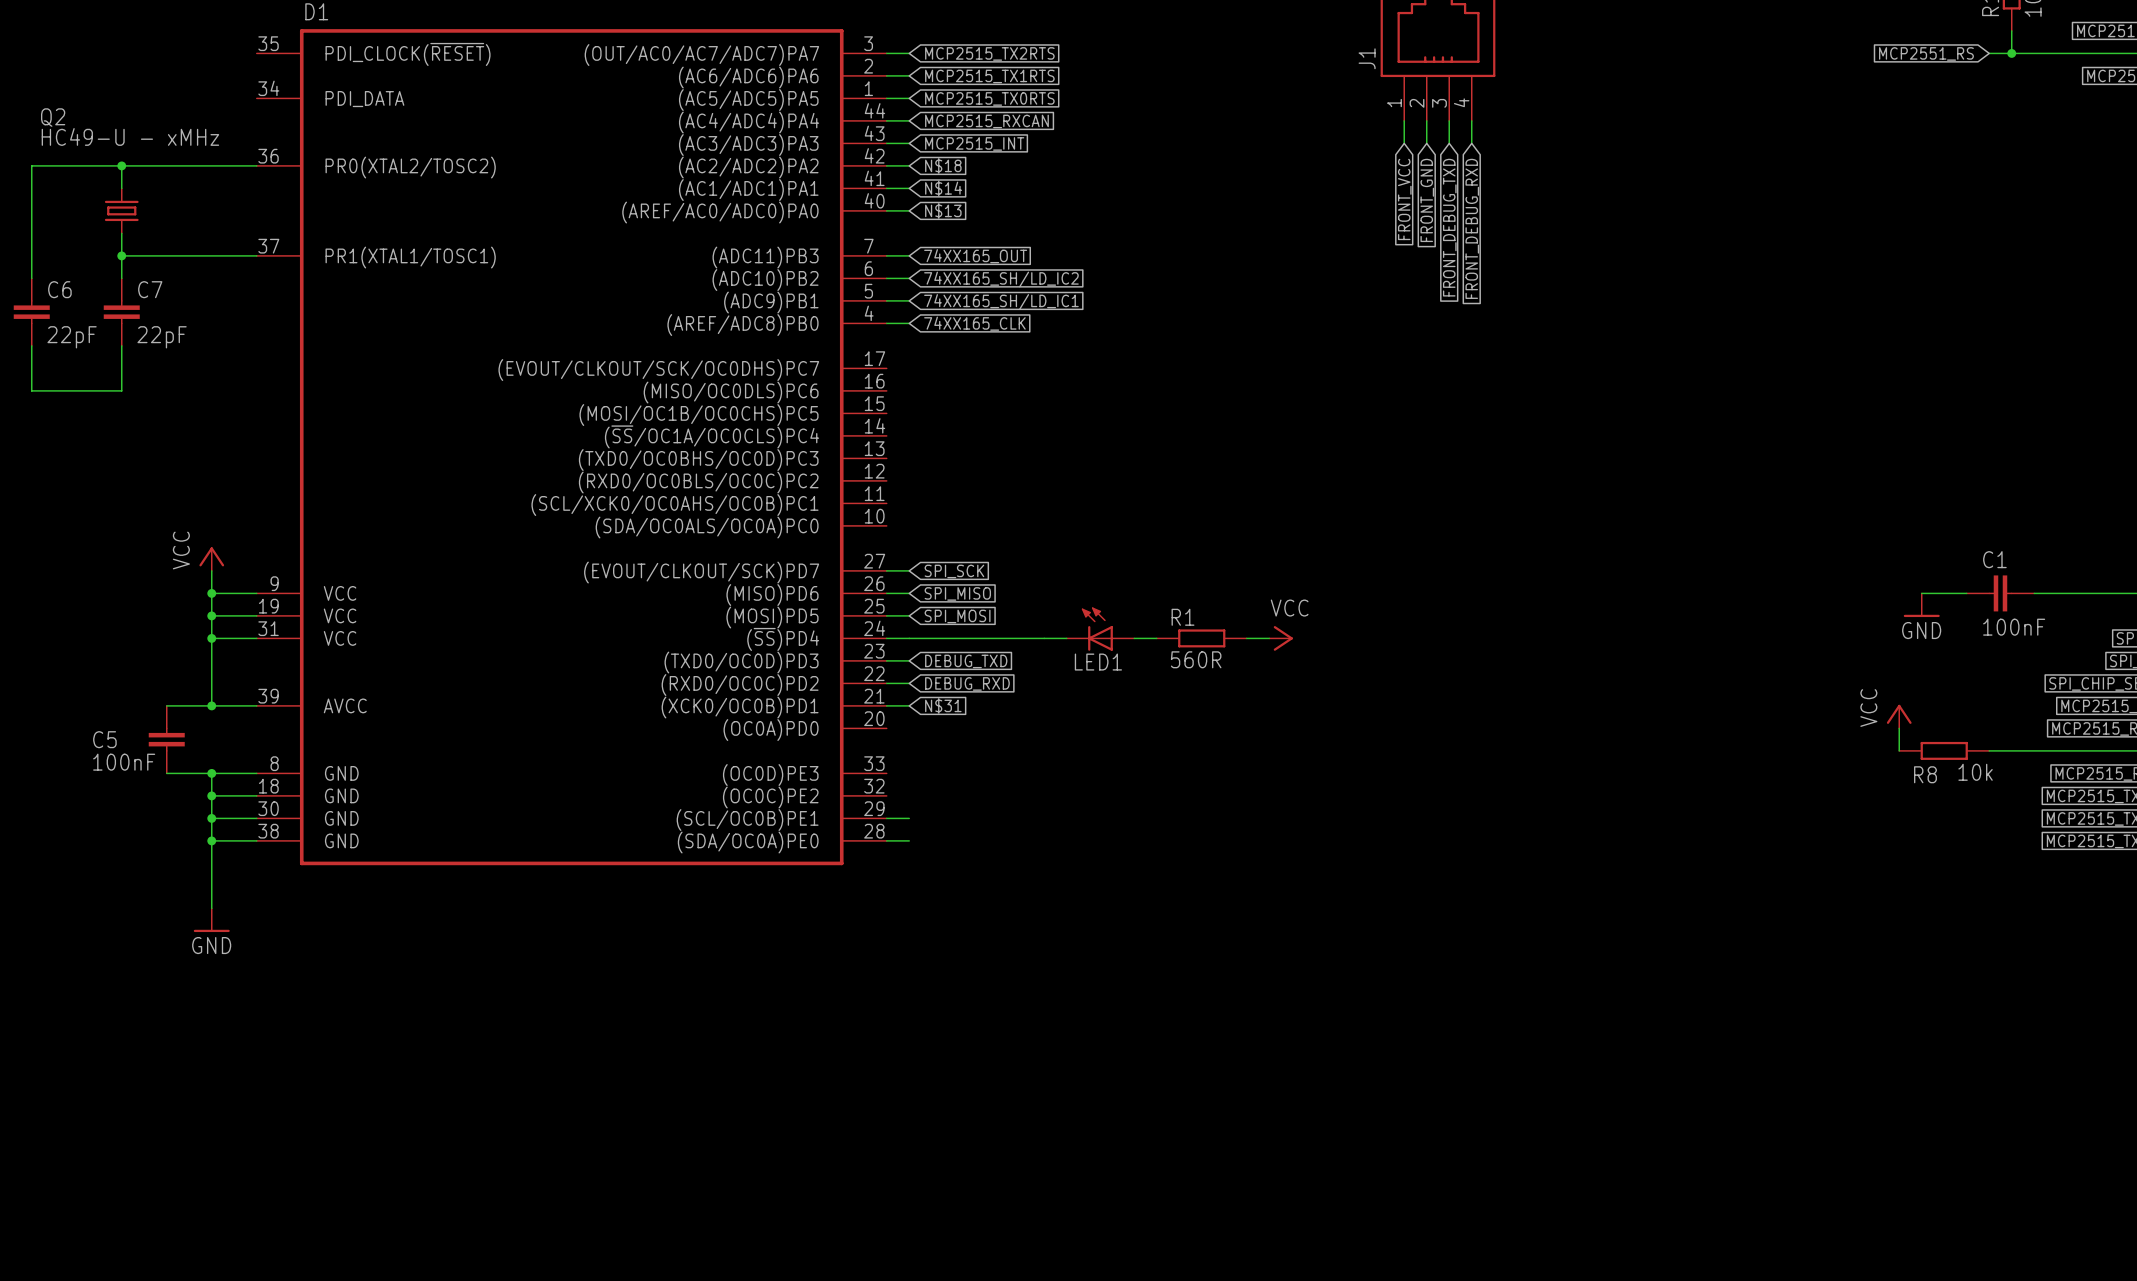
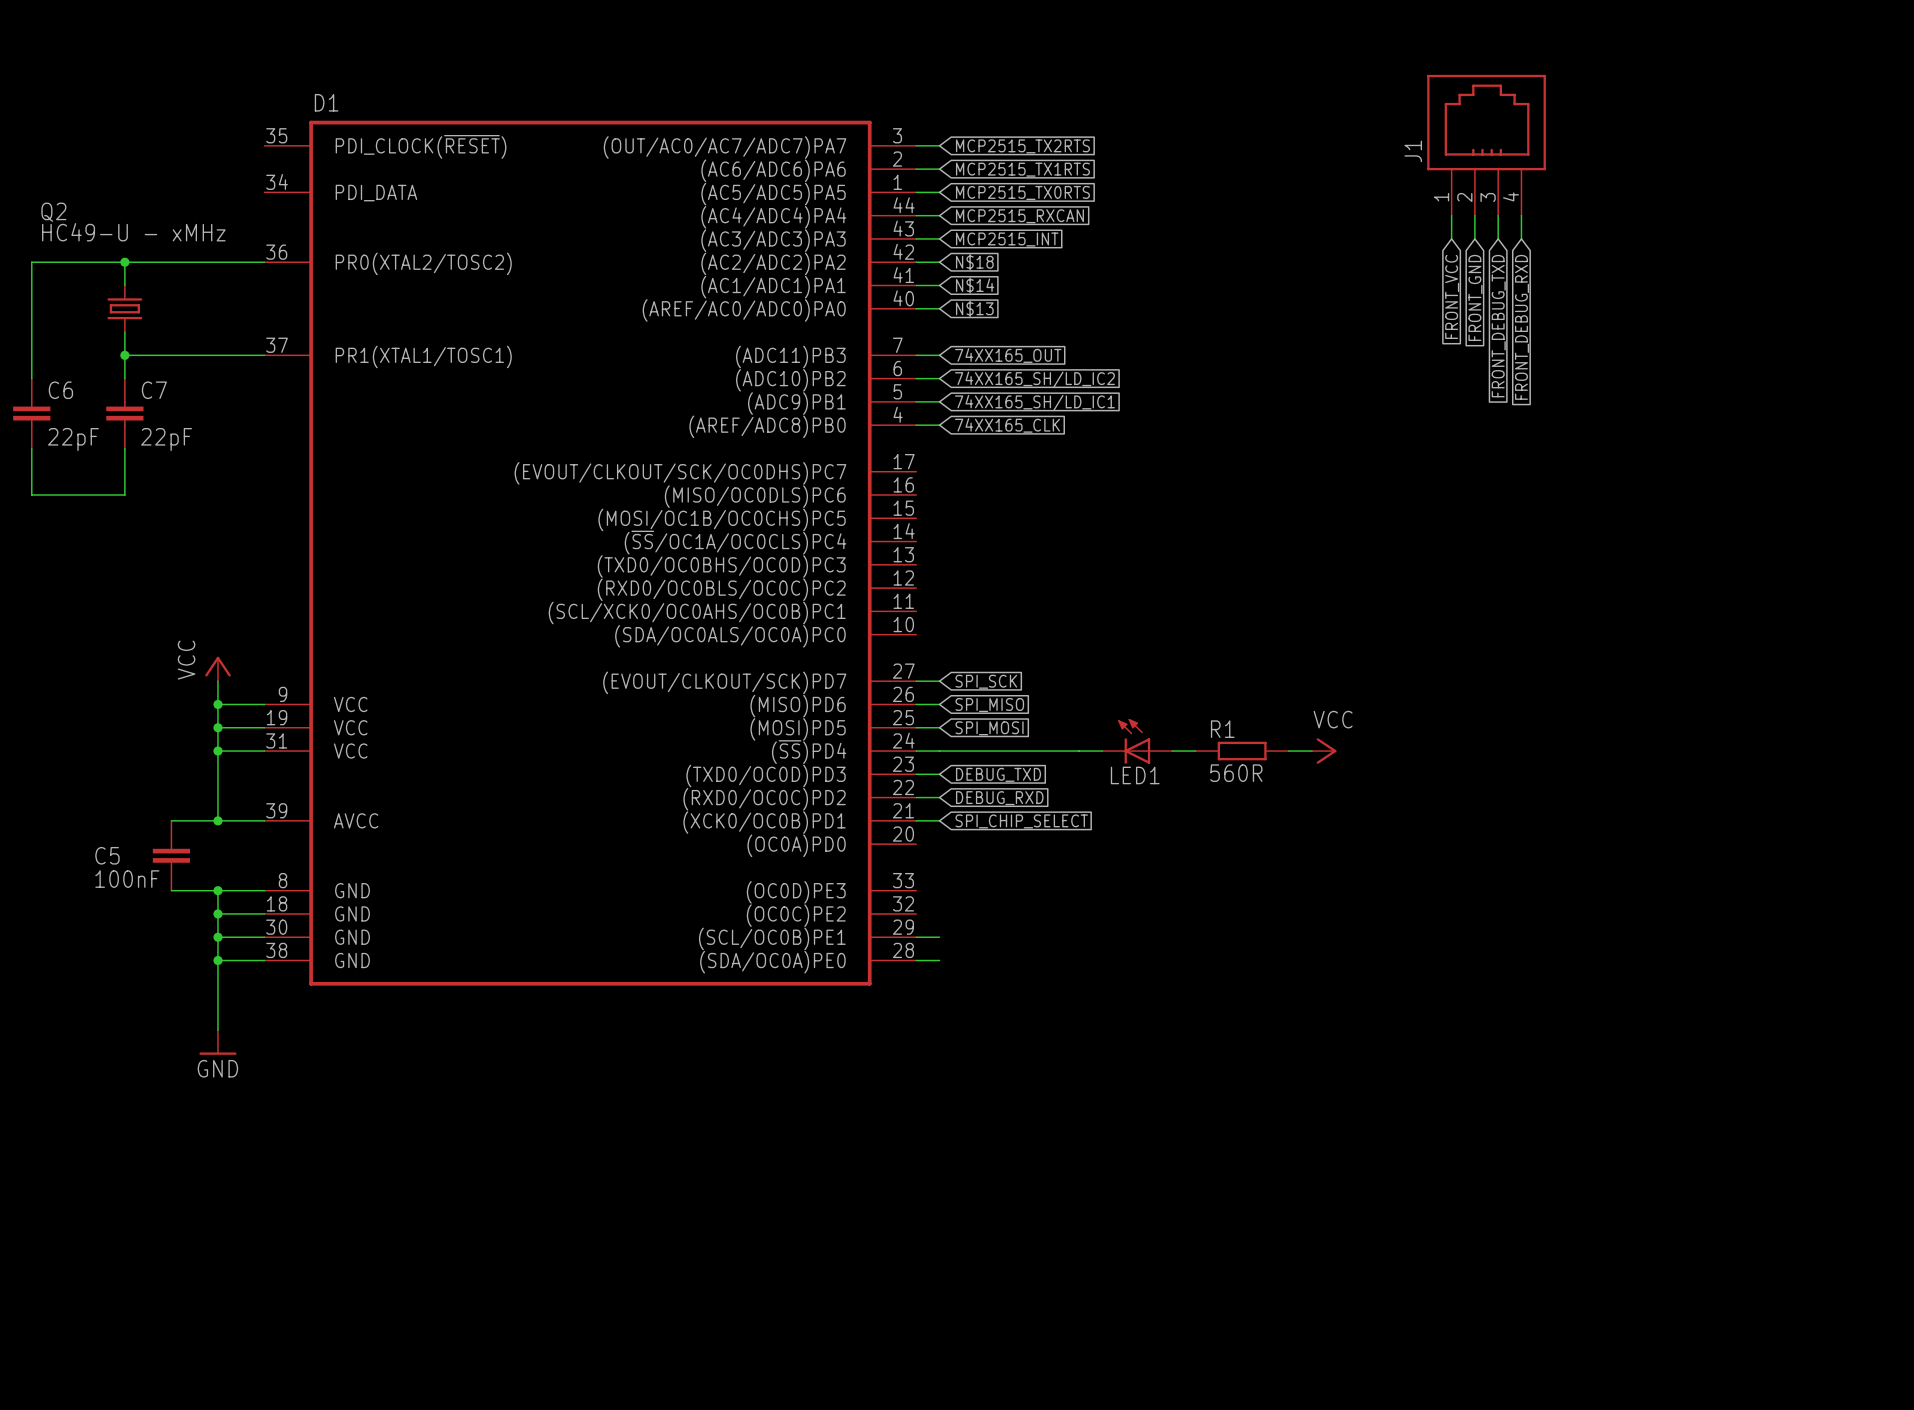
global label: N$31 (943, 705) -> SPI_CHIP_SELECT (1021, 821)

